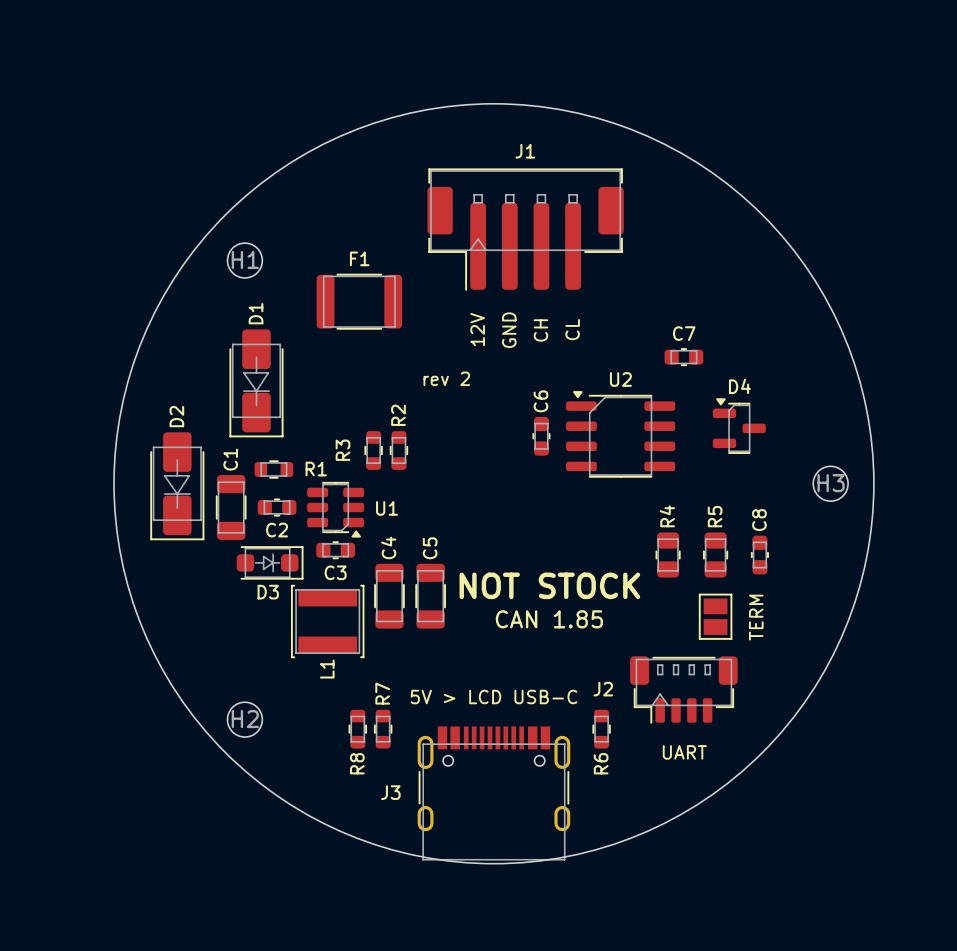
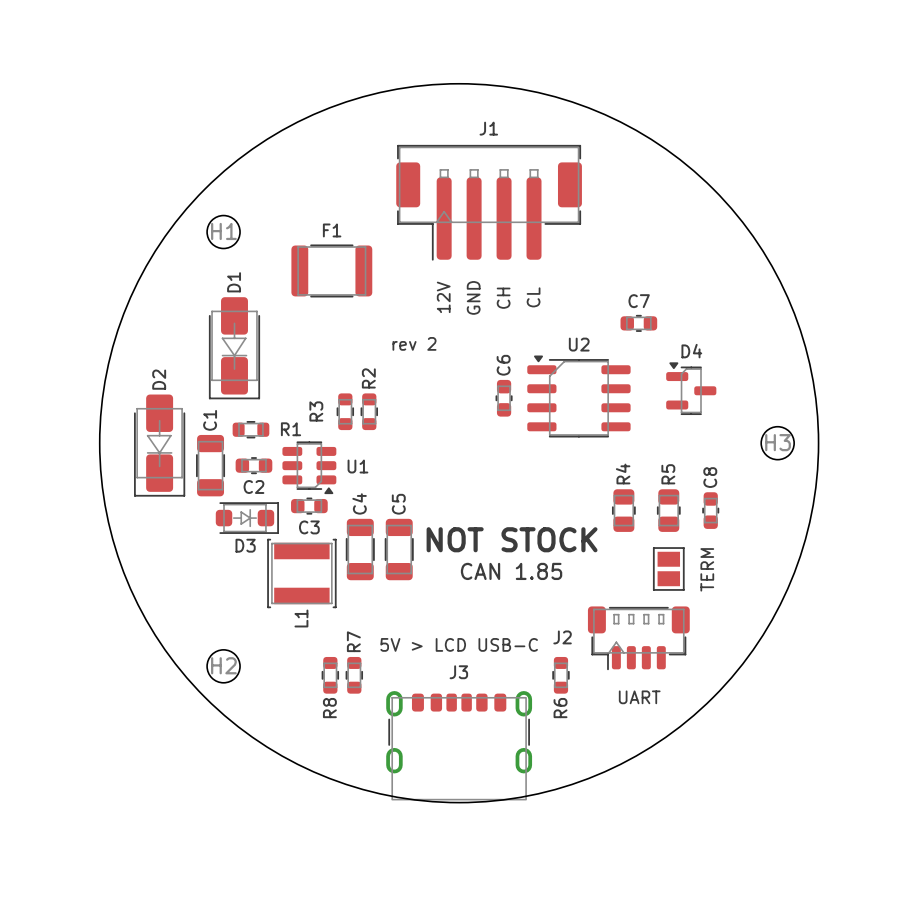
J3 footprint: [417, 726, 571, 861] -> [386, 691, 533, 801]
J3 name position: J3 (390, 792) -> J3 (458, 672)

